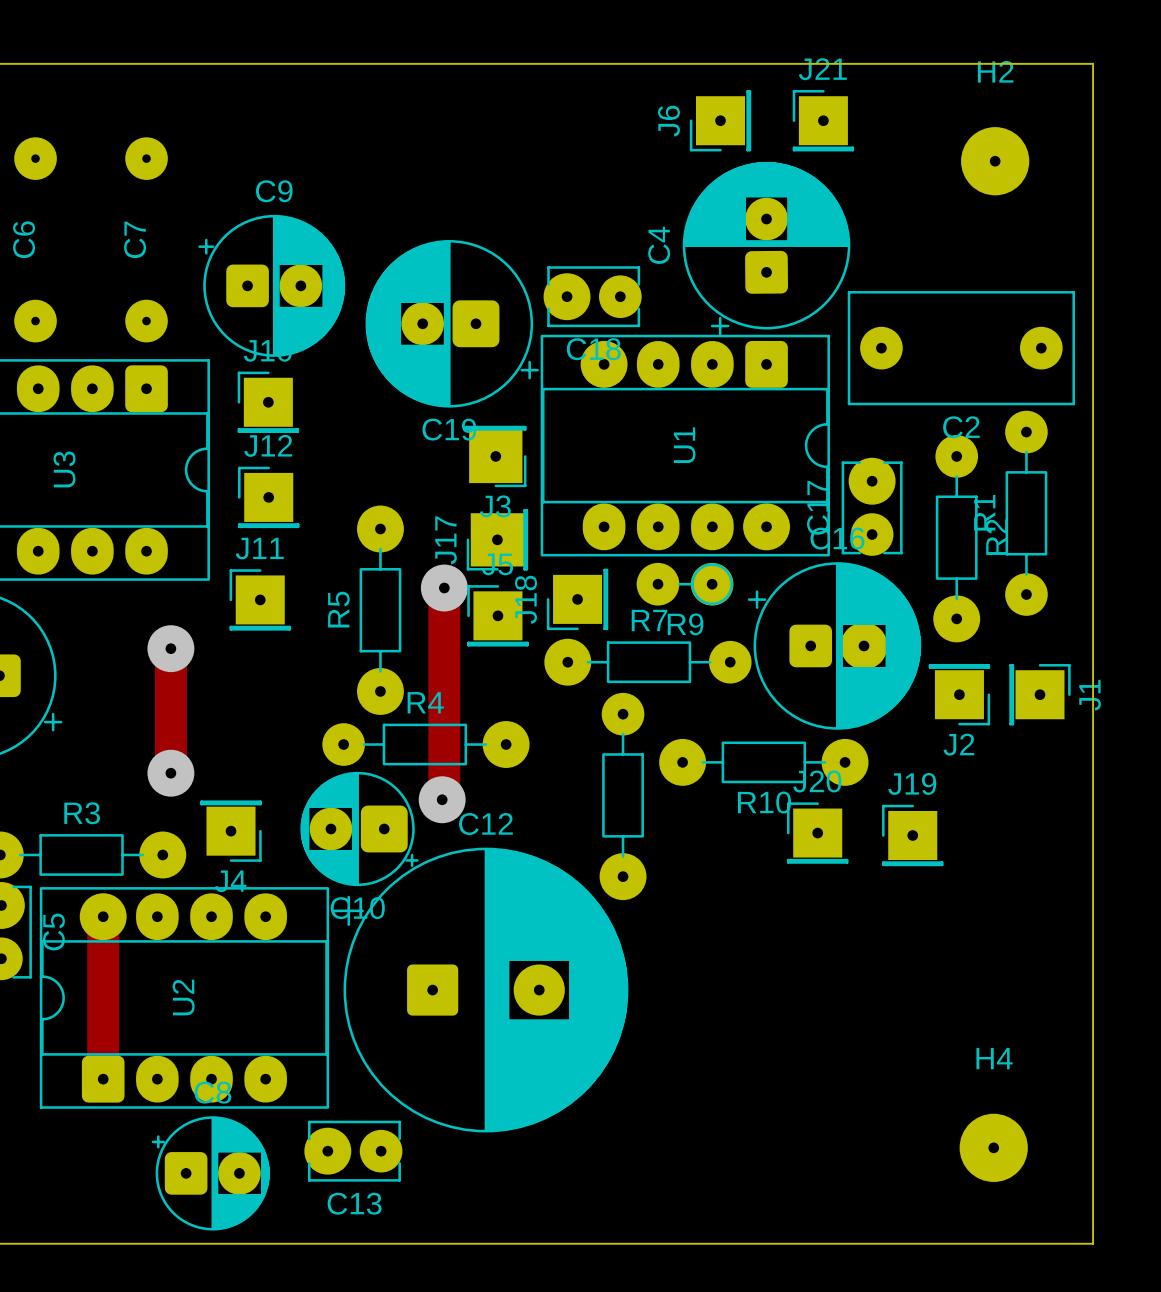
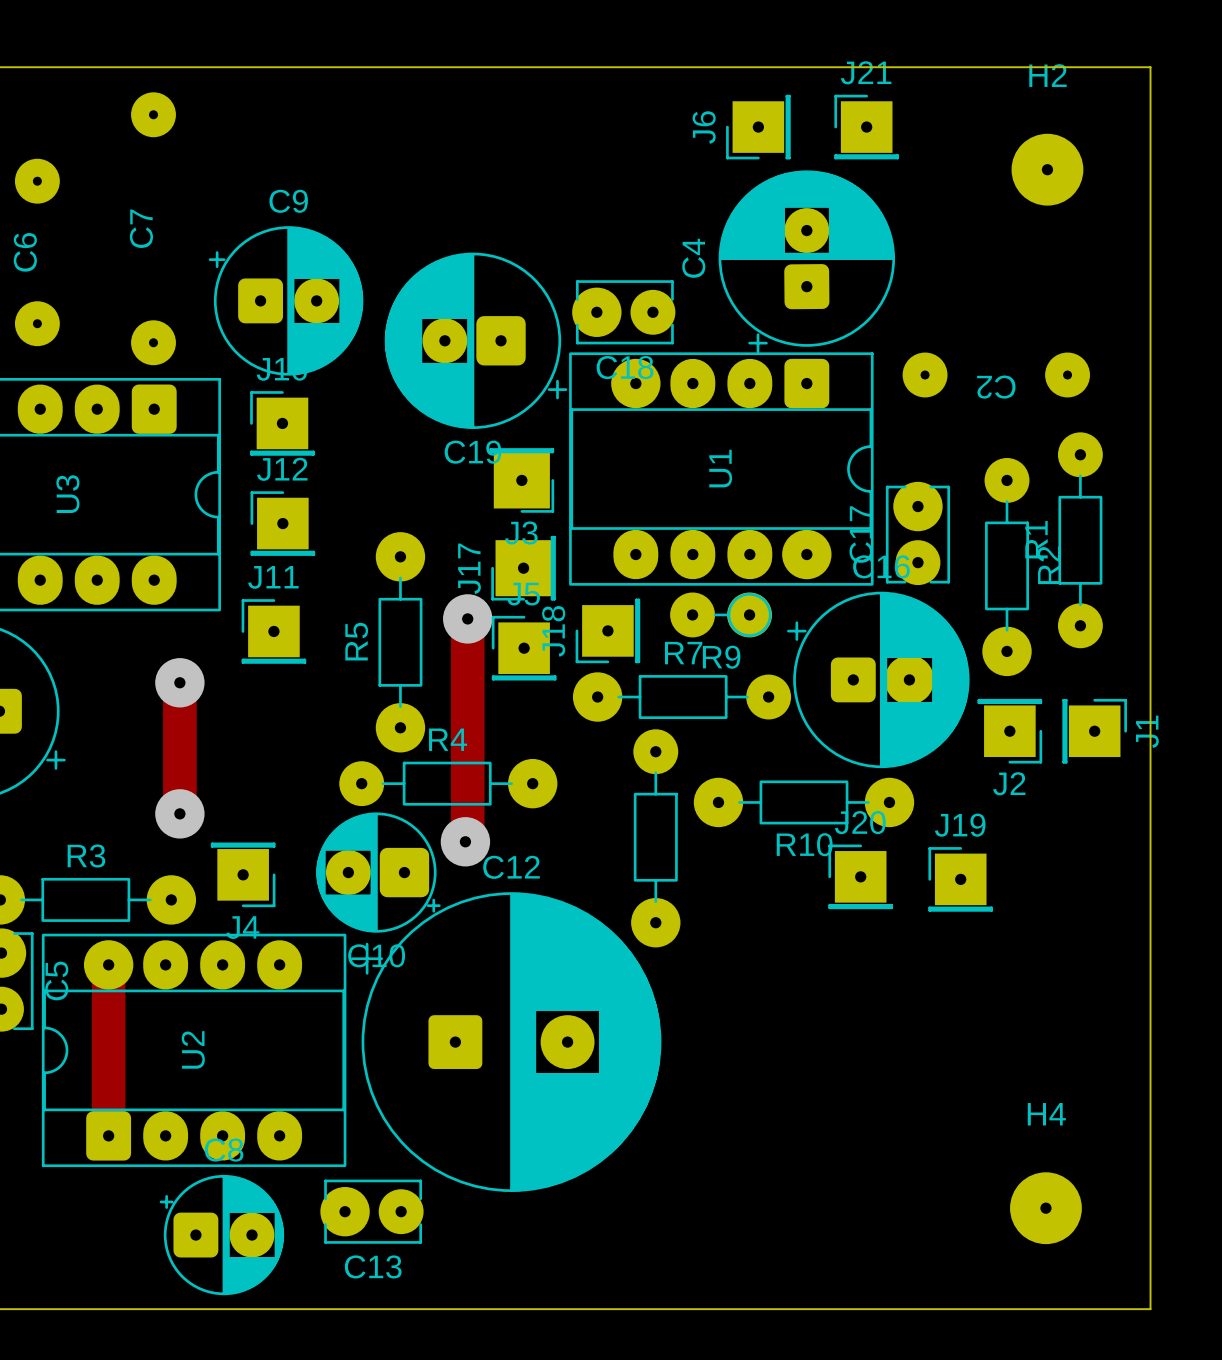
C6 footprint: [14, 137, 57, 343] -> [14, 158, 60, 347]
C7 footprint: [125, 137, 168, 343] -> [131, 92, 176, 366]
C2 footprint: [847, 291, 1076, 406] -> [902, 352, 1090, 398]
C2 name position: C2 (961, 427) -> C2 (996, 387)

